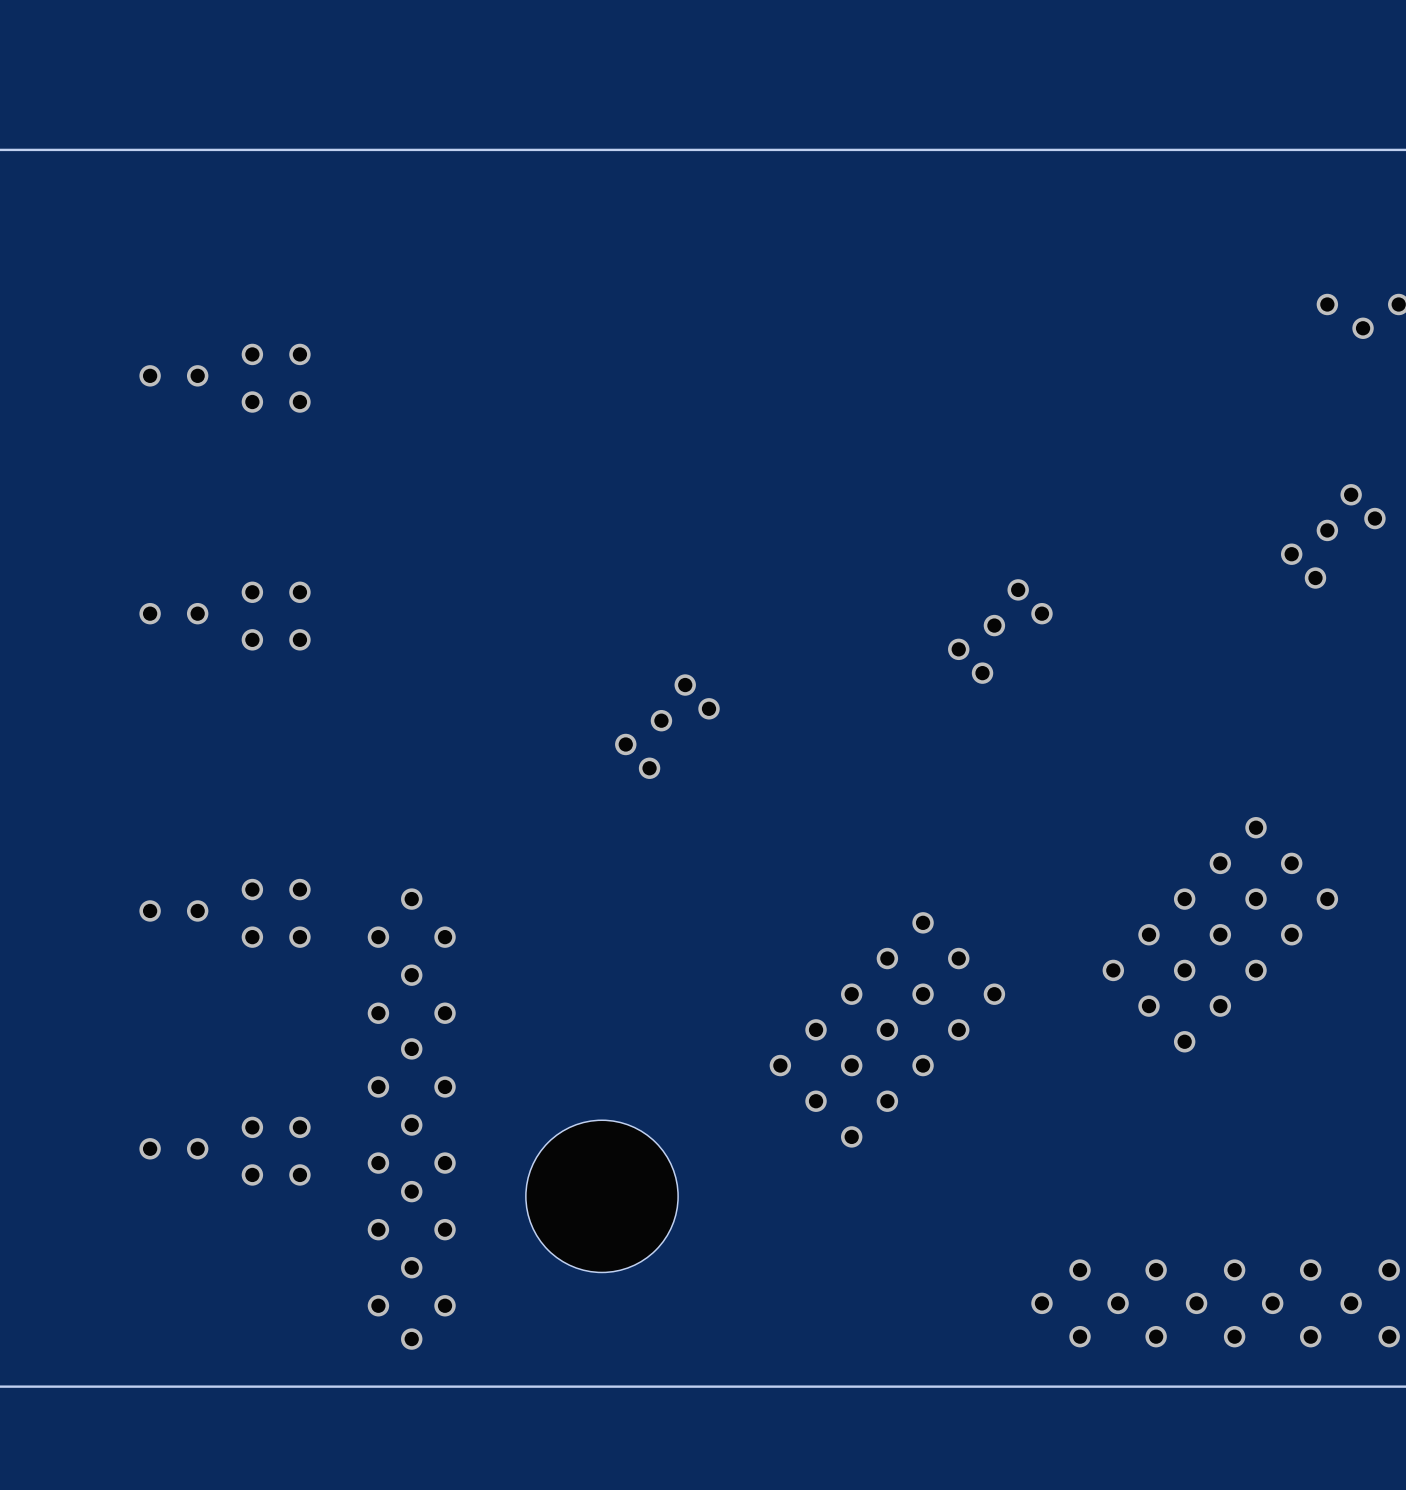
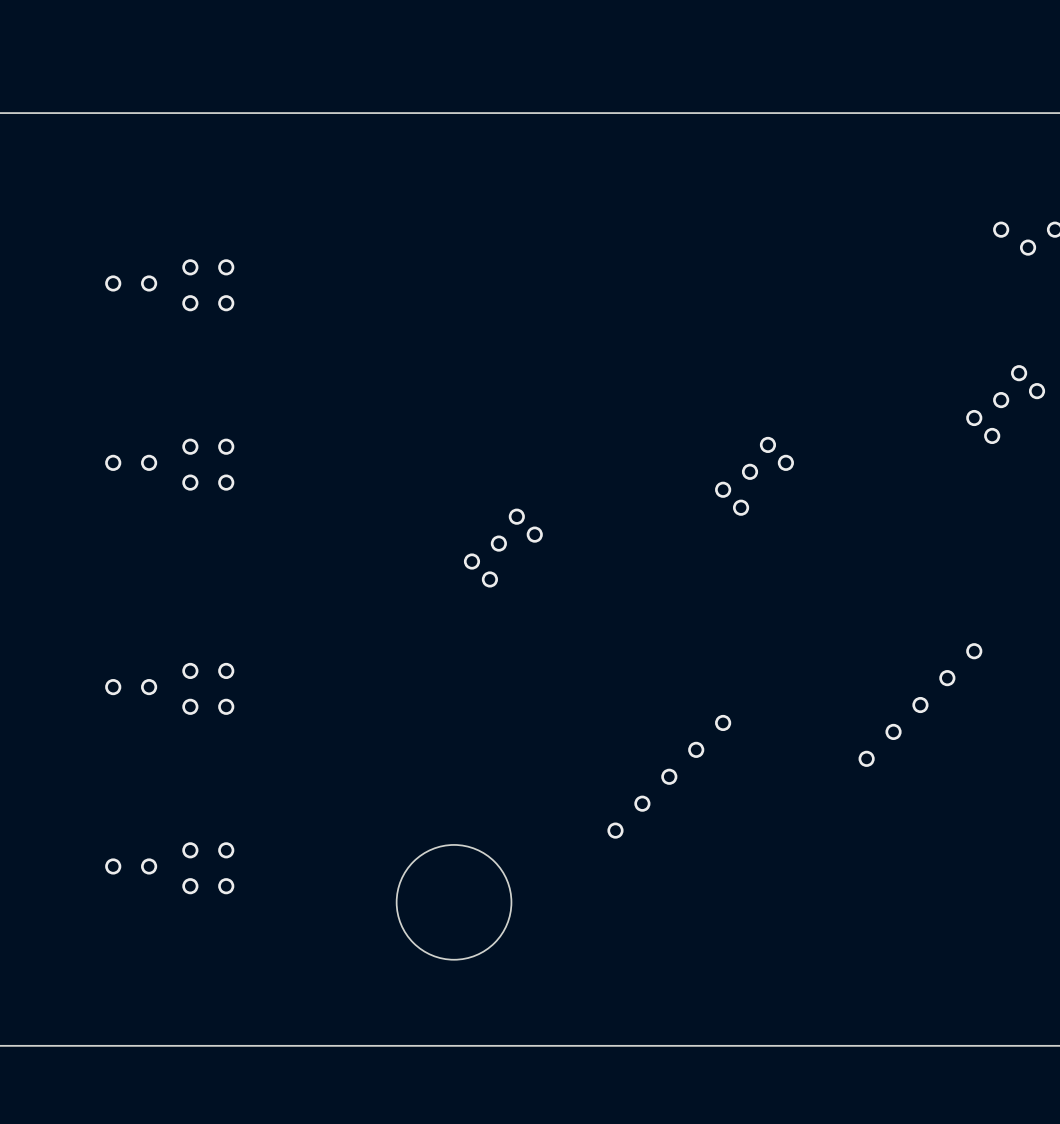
via: (1256, 827) -> none
via: (1220, 863) -> none
via: (411, 899) -> none
via: (1184, 899) -> none
via: (1327, 899) -> none
via: (923, 922) -> none
via: (1149, 934) -> none
via: (1291, 934) -> none
via: (378, 937) -> none
via: (445, 937) -> none
via: (887, 958) -> none
via: (1113, 970) -> none
via: (1256, 970) -> none
via: (411, 975) -> none
via: (851, 994) -> none
via: (994, 994) -> none
via: (1220, 1006) -> none
via: (378, 1013) -> none
via: (445, 1013) -> none
via: (816, 1029) -> none
via: (958, 1029) -> none
via: (1184, 1041) -> none
via: (411, 1048) -> none
via: (780, 1065) -> none
via: (923, 1065) -> none
via: (378, 1086) -> none
via: (445, 1086) -> none
via: (887, 1101) -> none
via: (411, 1125) -> none
via: (851, 1136) -> none
via: (378, 1163) -> none
via: (445, 1163) -> none
via: (411, 1191) -> none
via: (378, 1229) -> none
via: (445, 1229) -> none
via: (411, 1267) -> none
via: (1080, 1270) -> none
via: (1156, 1270) -> none
via: (1234, 1270) -> none
via: (1310, 1270) -> none
via: (1389, 1270) -> none
via: (1041, 1303) -> none
via: (1118, 1303) -> none
via: (1196, 1303) -> none
via: (1272, 1303) -> none
via: (1351, 1303) -> none
via: (378, 1305) -> none
via: (445, 1305) -> none
via: (1080, 1336) -> none
via: (1156, 1336) -> none
via: (1234, 1336) -> none
via: (1310, 1336) -> none
via: (1389, 1336) -> none
via: (411, 1339) -> none

